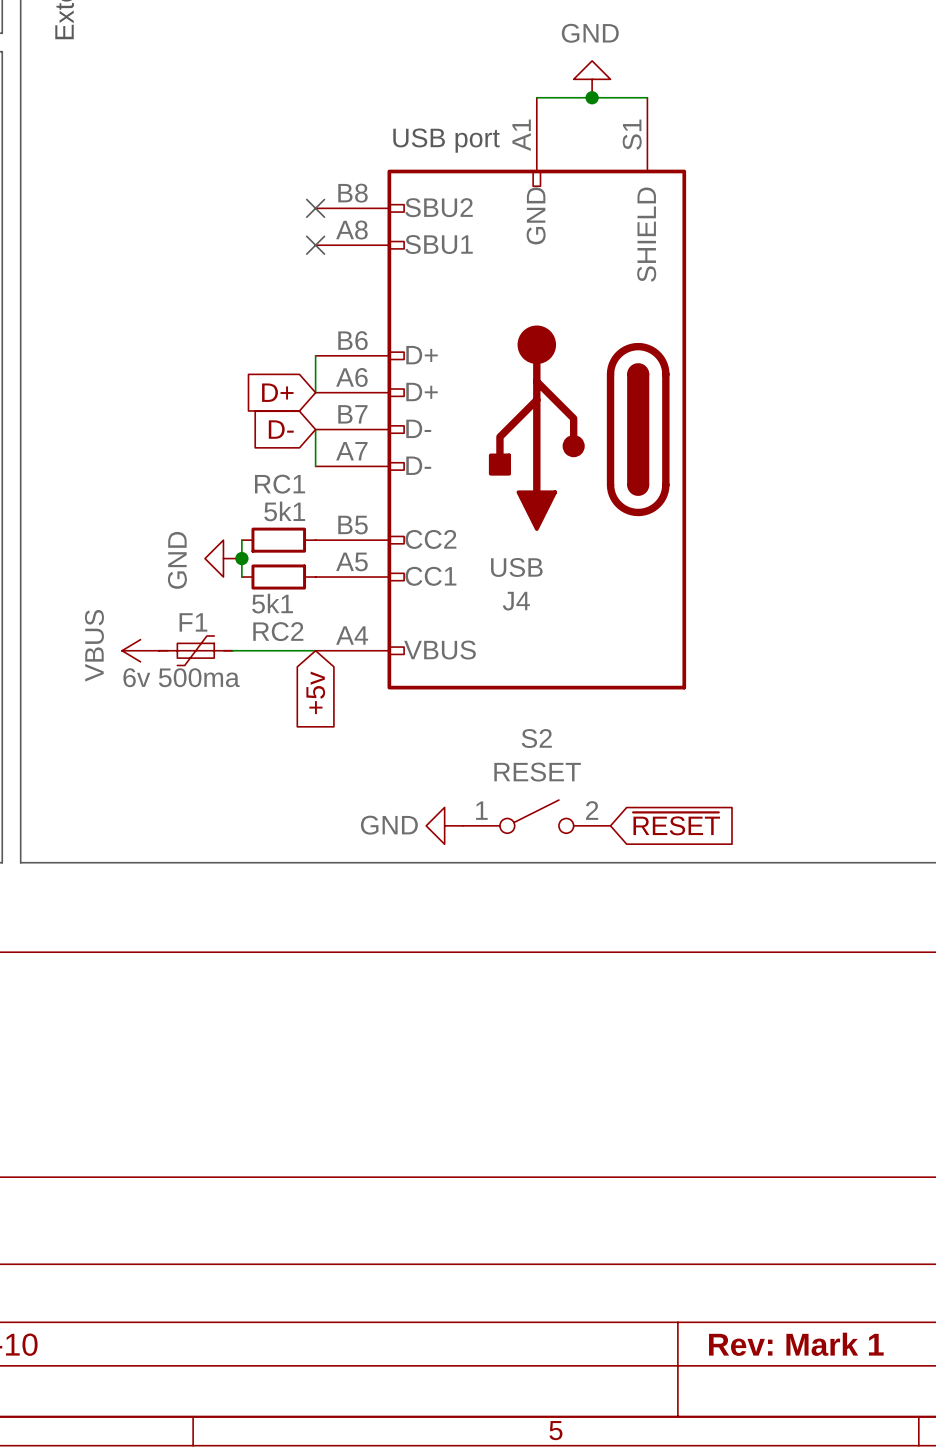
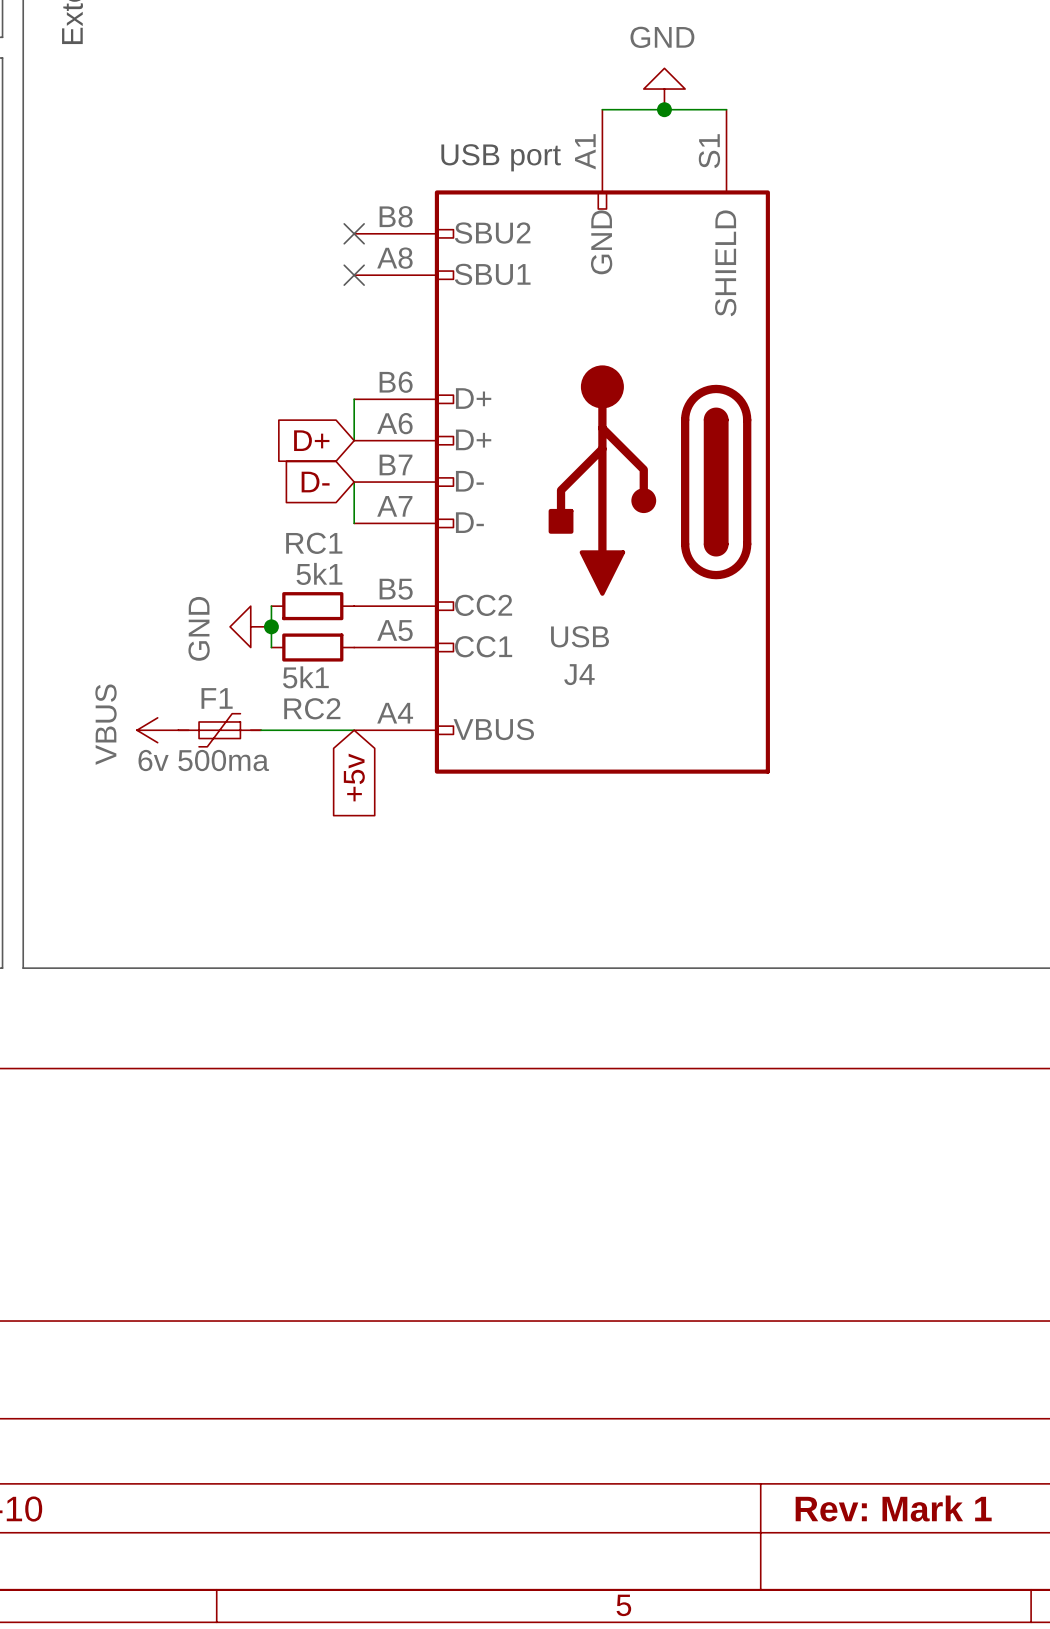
S2: RESET (536, 816) -> none
global label: ~{RESET} (676, 823) -> none
power symbol: GND (444, 825) -> none

